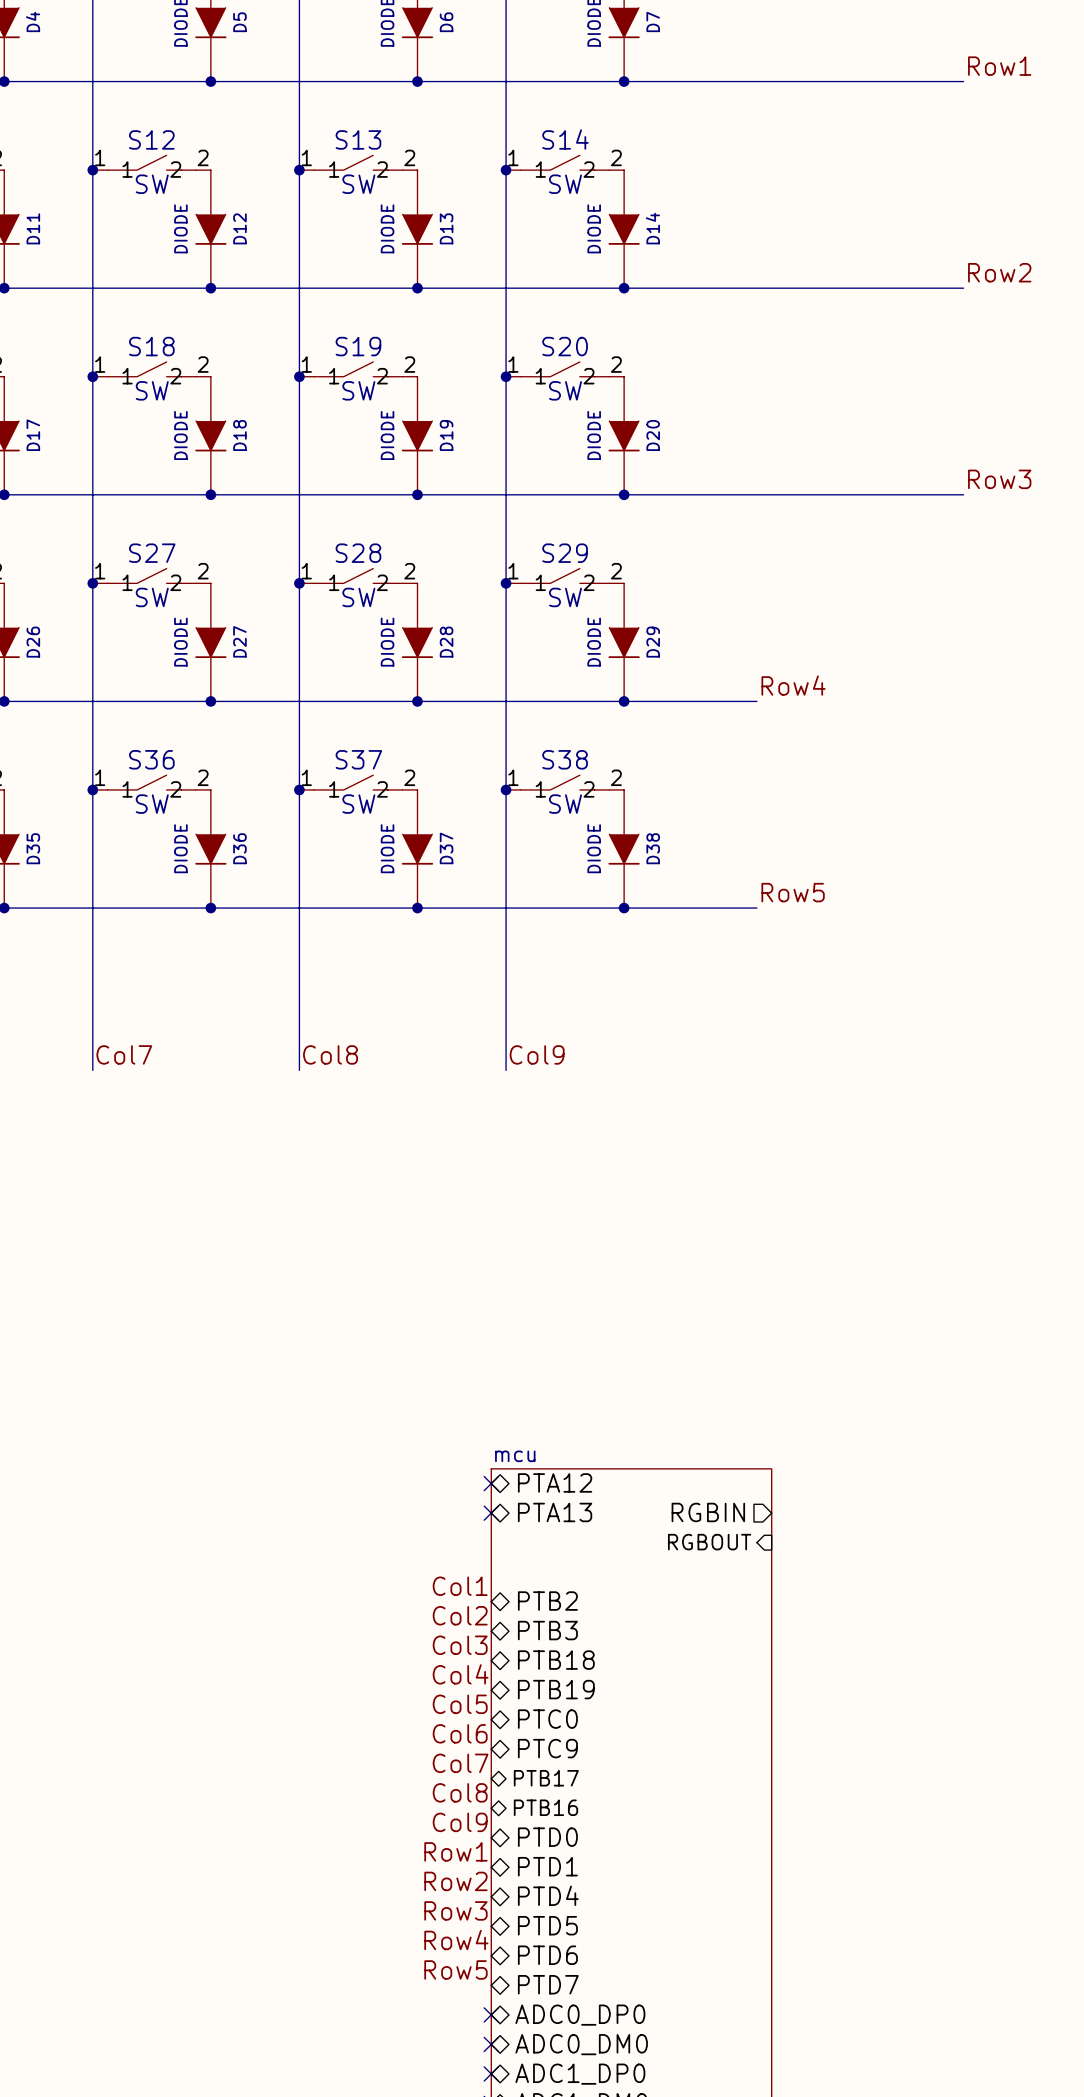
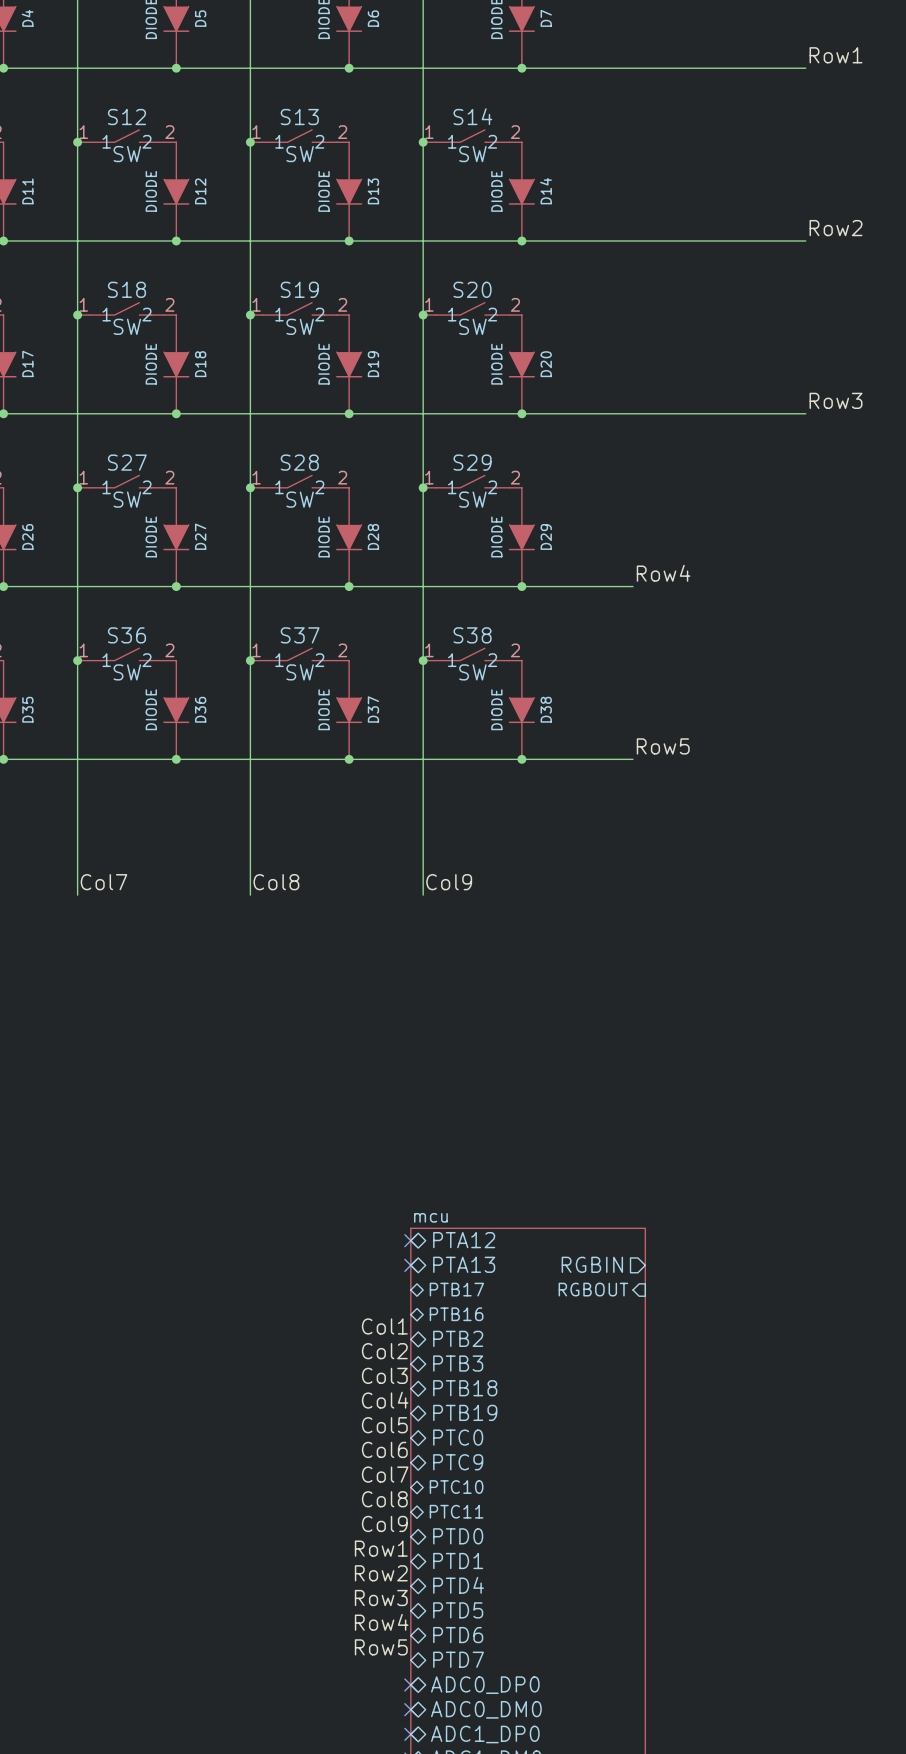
sheet pin: none -> PTB17 (456, 1289)
sheet pin: none -> PTB16 (456, 1314)
sheet pin: PTB17 (546, 1778) -> PTC10 (456, 1487)
sheet pin: PTB16 (545, 1807) -> PTC11 (456, 1511)

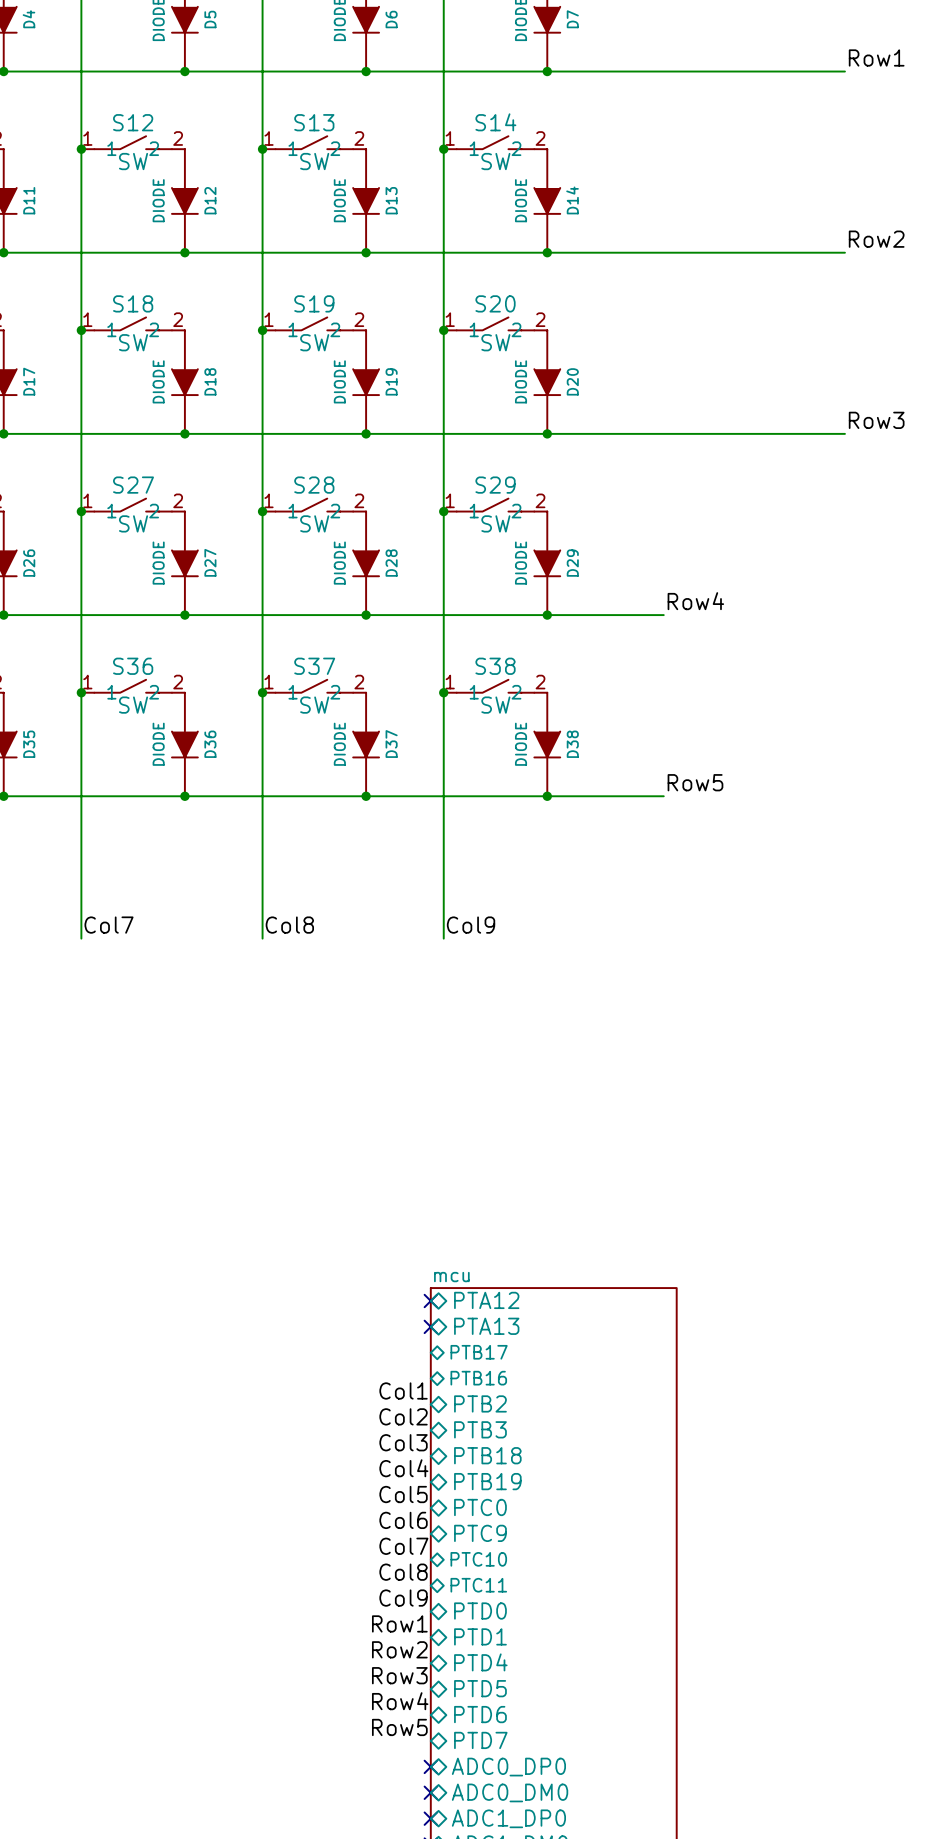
sheet pin: RGBIN (592, 1264) -> none
sheet pin: RGBOUT (593, 1289) -> none

